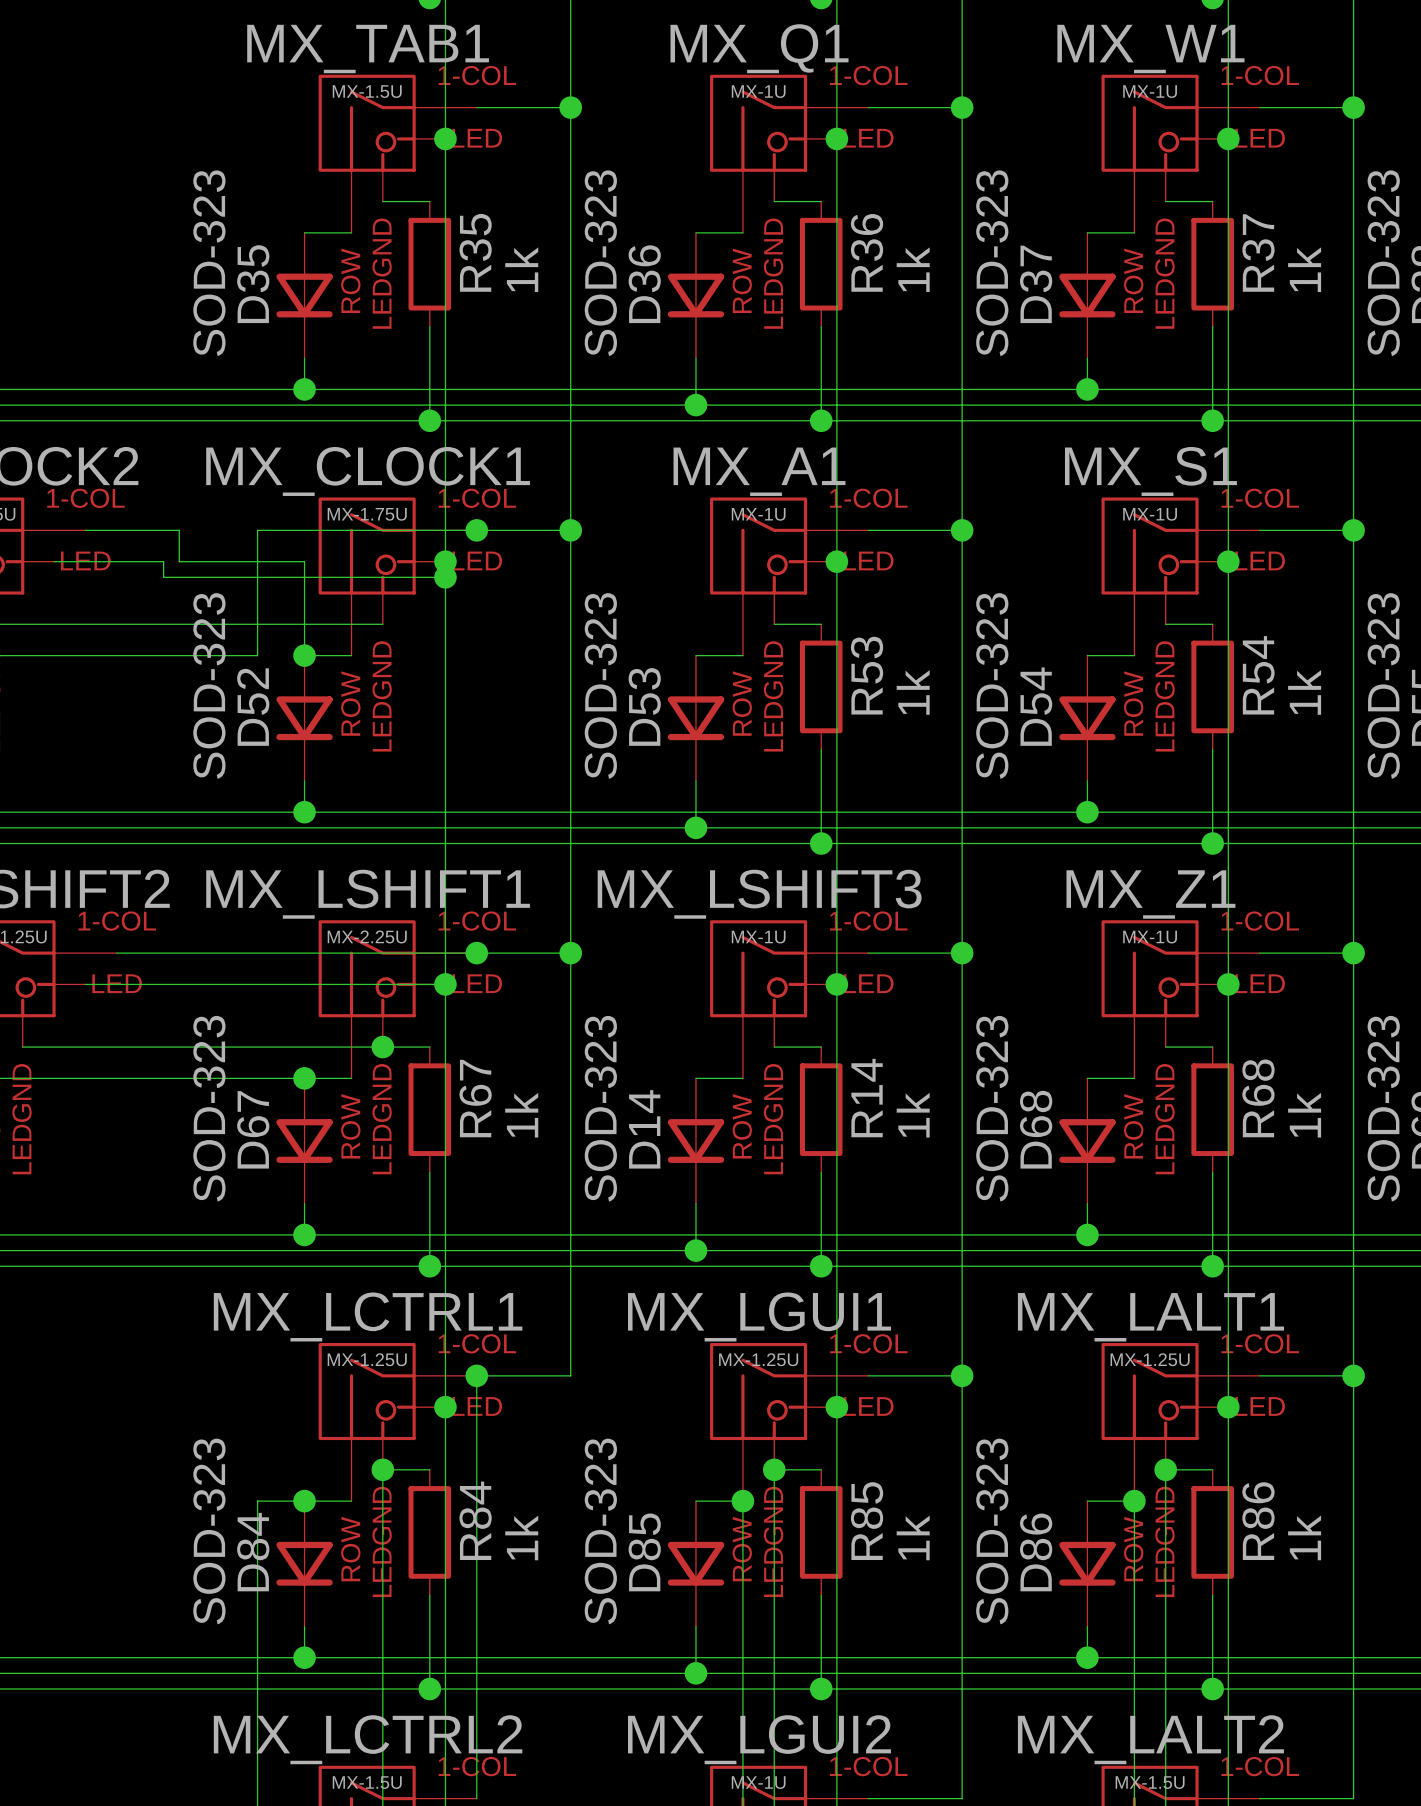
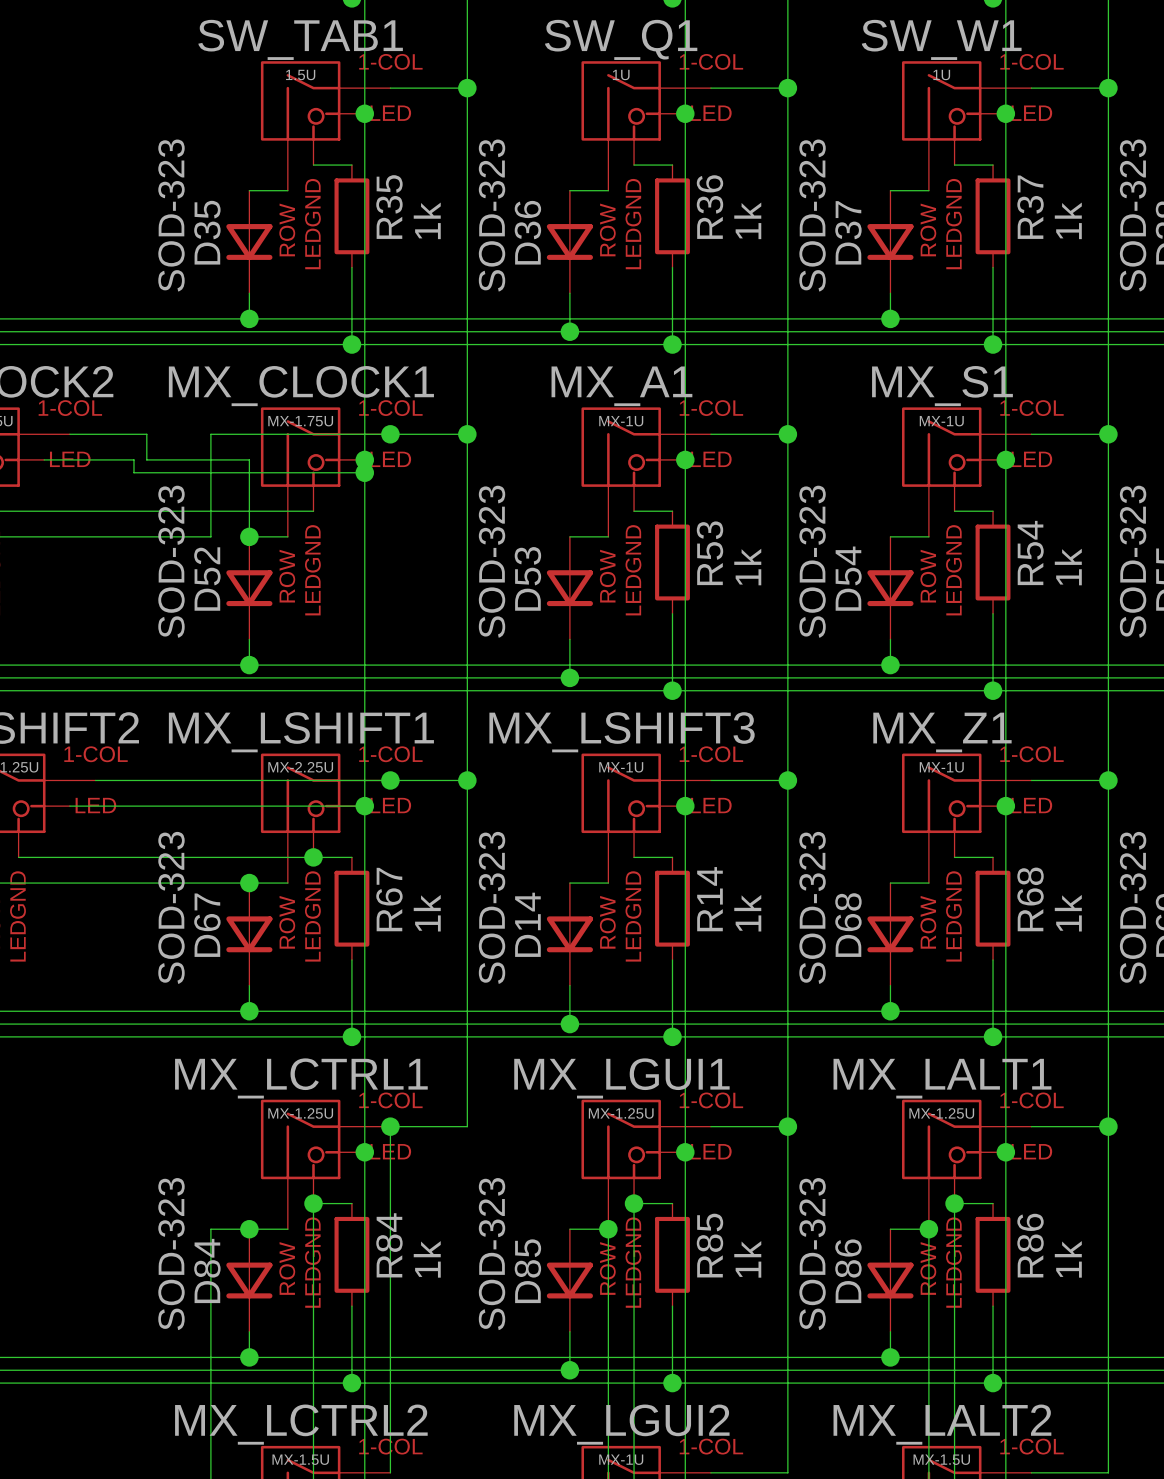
MX_Q1 name: MX_Q1 (759, 48) -> SW_Q1 (621, 39)
MX_TAB1 name: MX_TAB1 (368, 49) -> SW_TAB1 (300, 39)
MX_W1 name: MX_W1 (1150, 49) -> SW_W1 (941, 39)
MX_TAB1 value: MX-1.5U (367, 91) -> 1.5U (300, 74)
MX_Q1 value: MX-1U (758, 91) -> 1U (621, 74)
MX_W1 value: MX-1U (1150, 91) -> 1U (941, 74)

